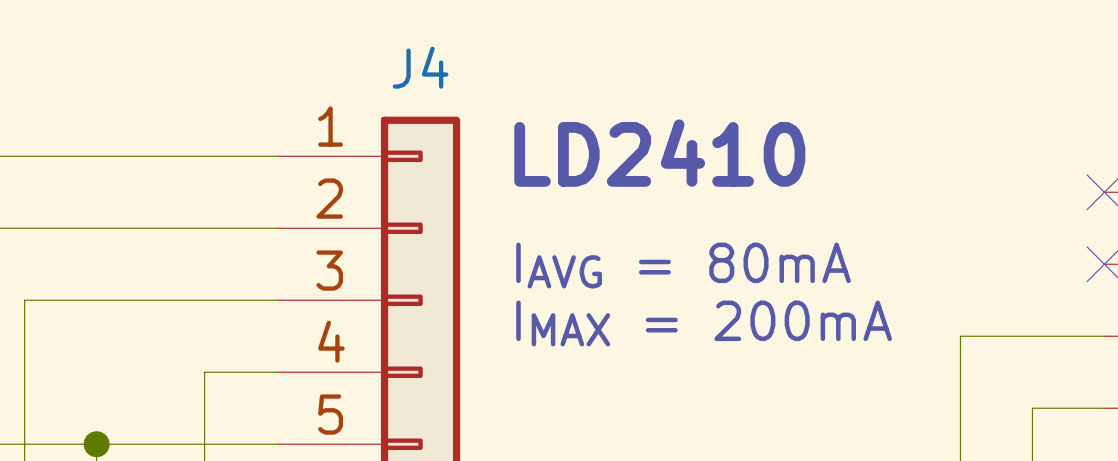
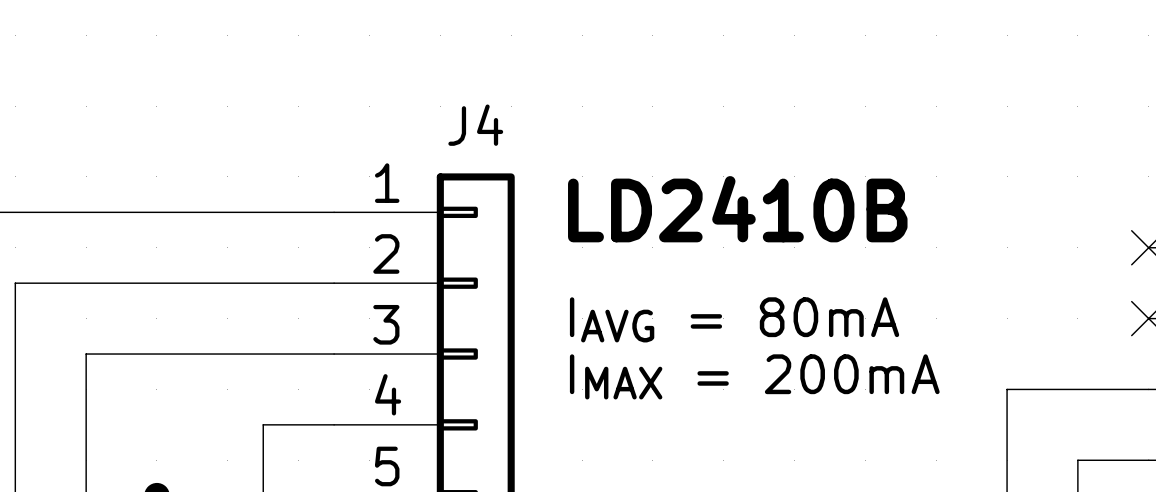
text: LD2410 (659, 153) -> LD2410B (737, 209)

